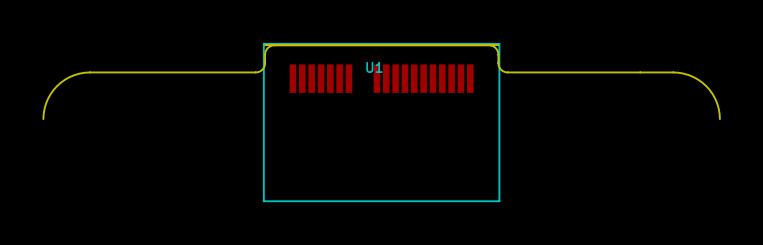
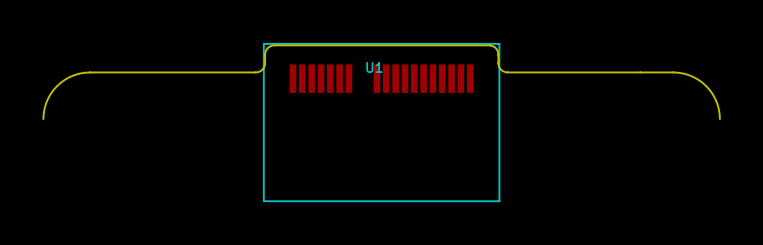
part footprint: [263, 43, 501, 202] -> [263, 43, 501, 202]

